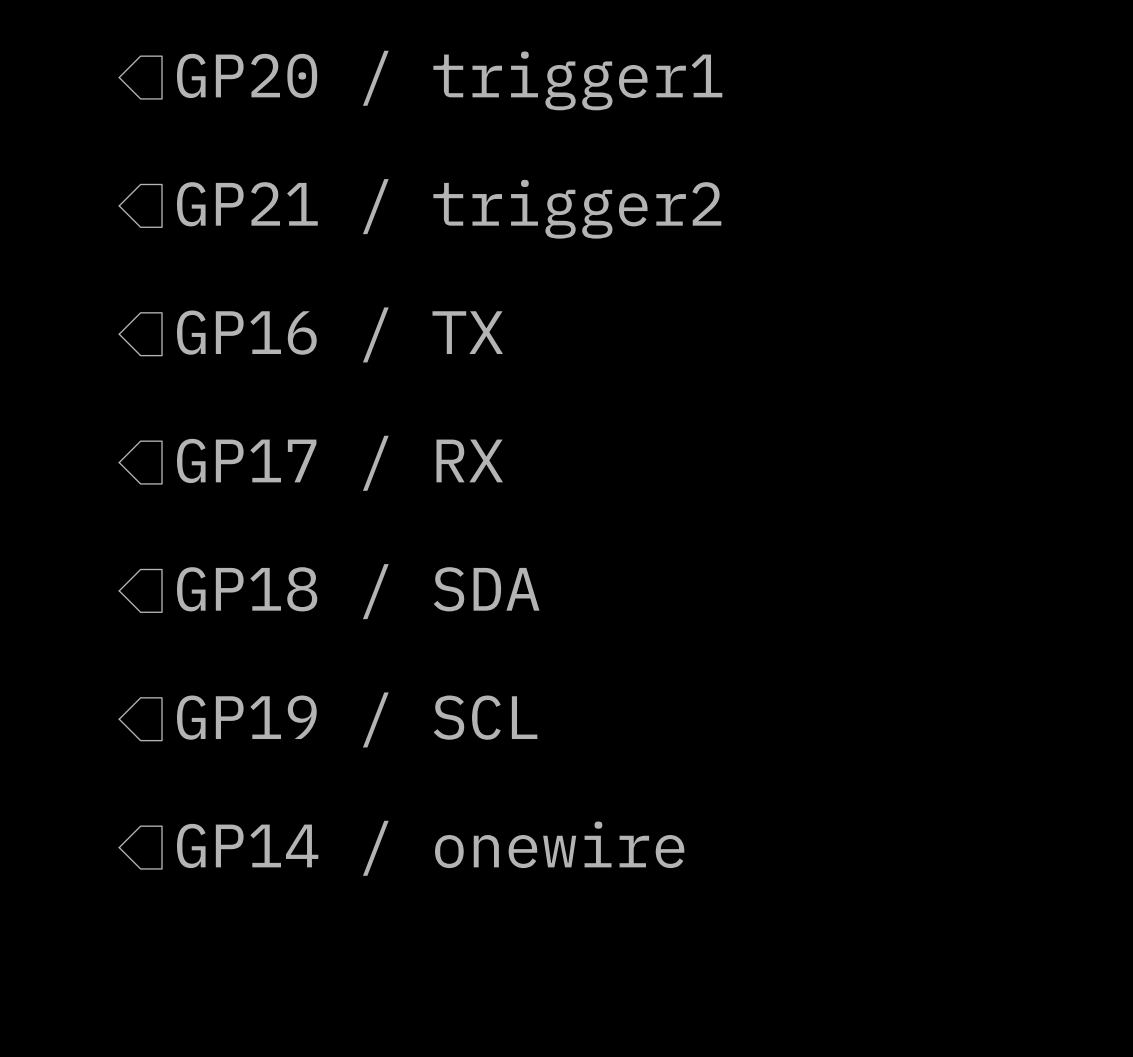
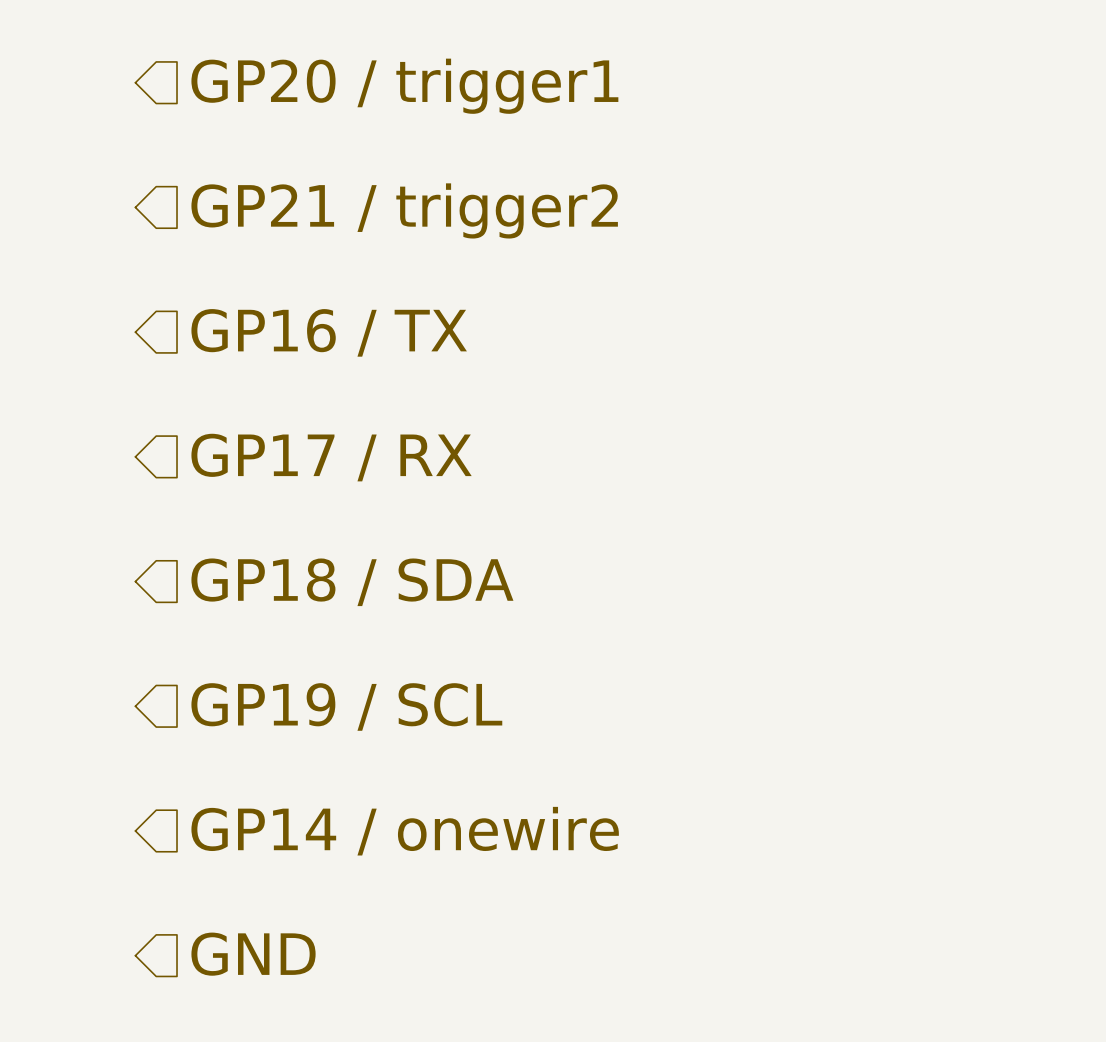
hierarchical label: none -> GND (253, 954)

